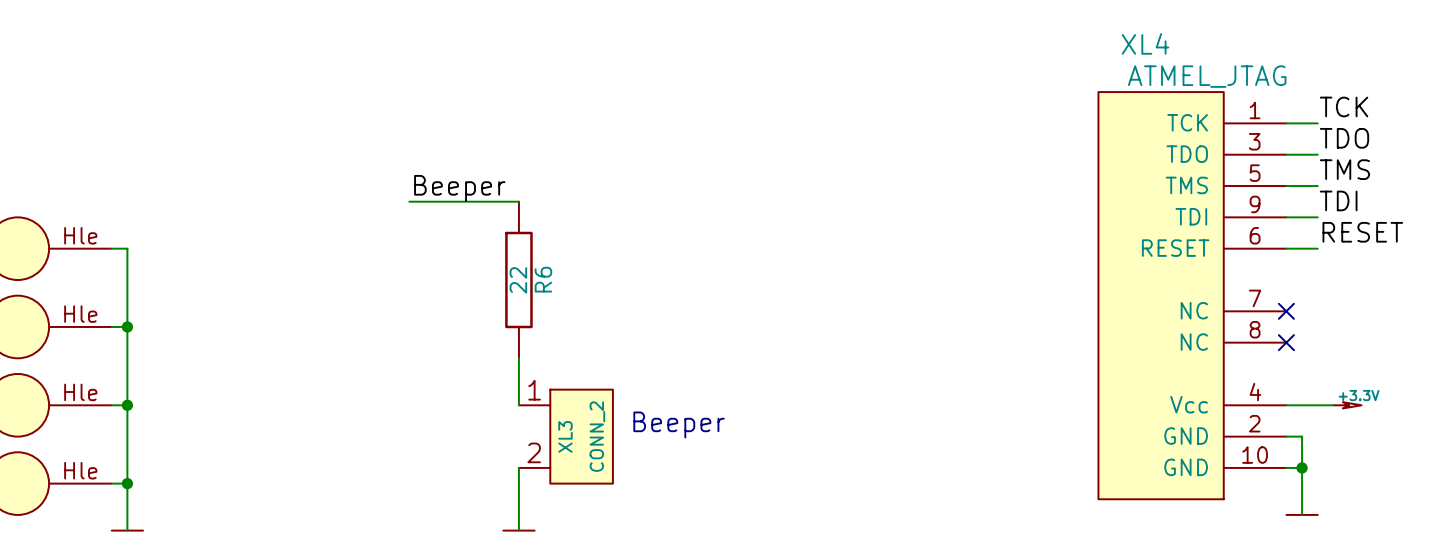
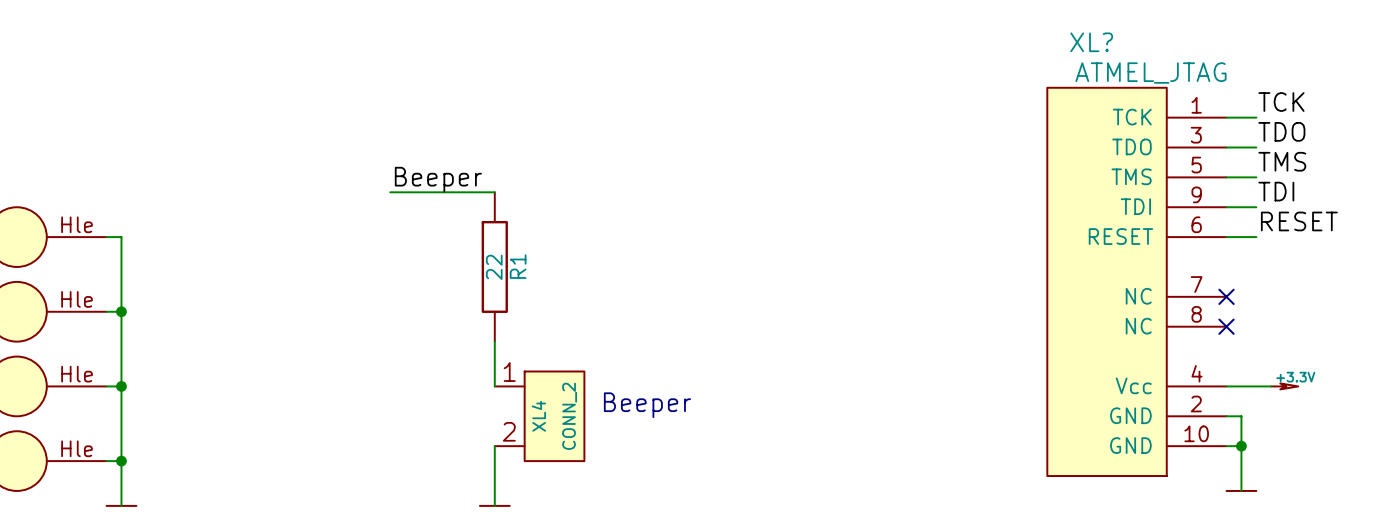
XL4 name: XL4 (1145, 43) -> XL? (1091, 42)
R6 name: R6 (543, 279) -> R1 (518, 266)
XL3 name: XL3 (565, 436) -> XL4 (538, 416)

